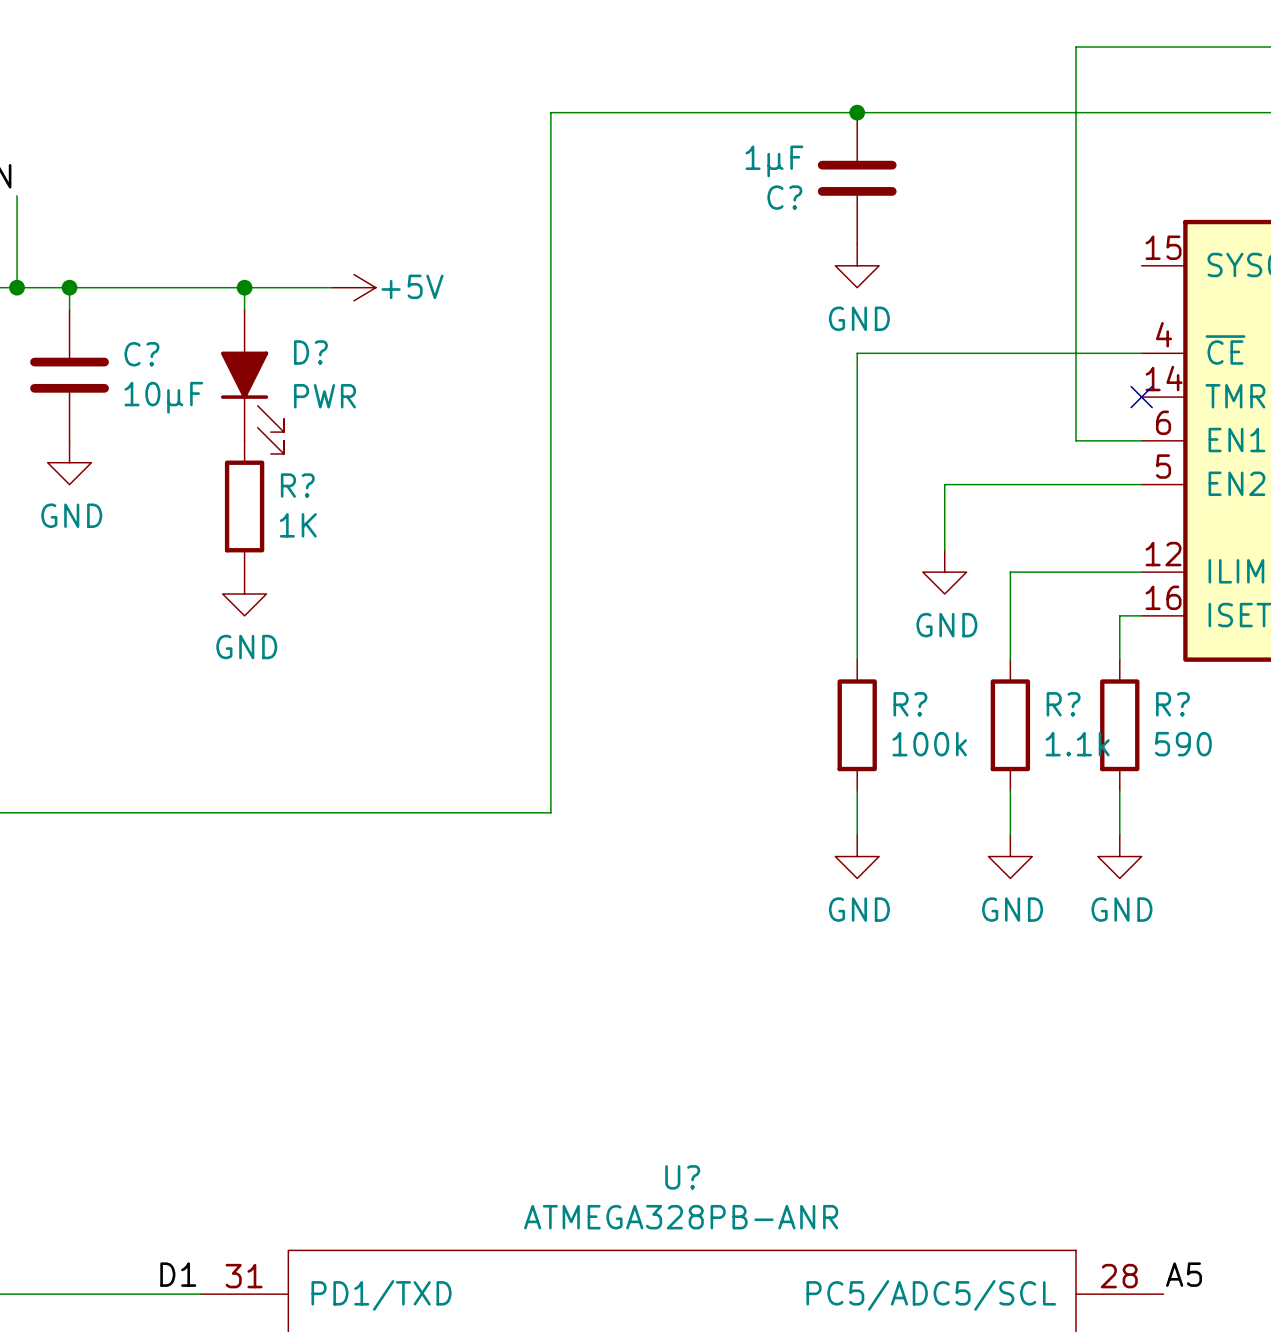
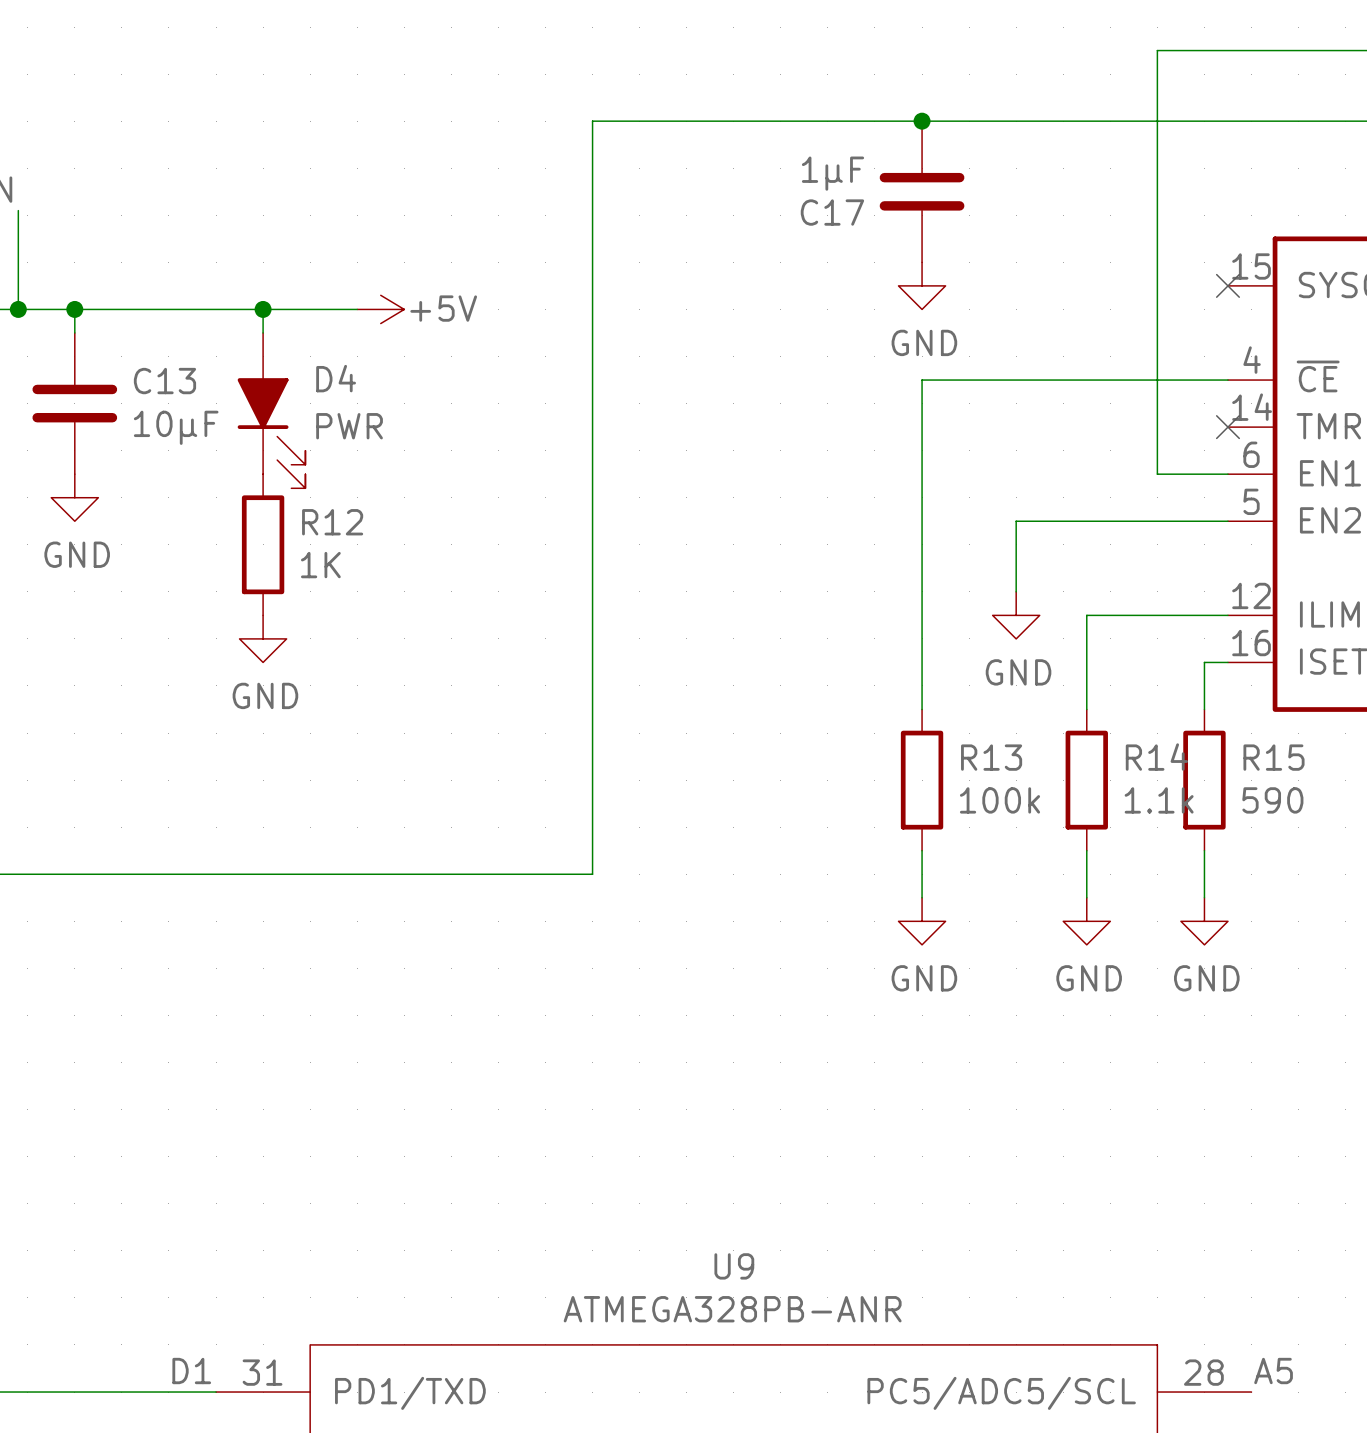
C? name: C? (784, 197) -> C17 (832, 212)
no-connect mark: none -> (1227, 285)
D? name: D? (310, 352) -> D4 (336, 378)
C? name: C? (141, 354) -> C13 (164, 381)
R? name: R? (297, 485) -> R12 (332, 522)
R? name: R? (910, 704) -> R13 (991, 757)
R? name: R? (1063, 704) -> R14 (1156, 757)
R? name: R? (1172, 704) -> R15 (1274, 757)
U? name: U? (682, 1177) -> U9 (734, 1266)

